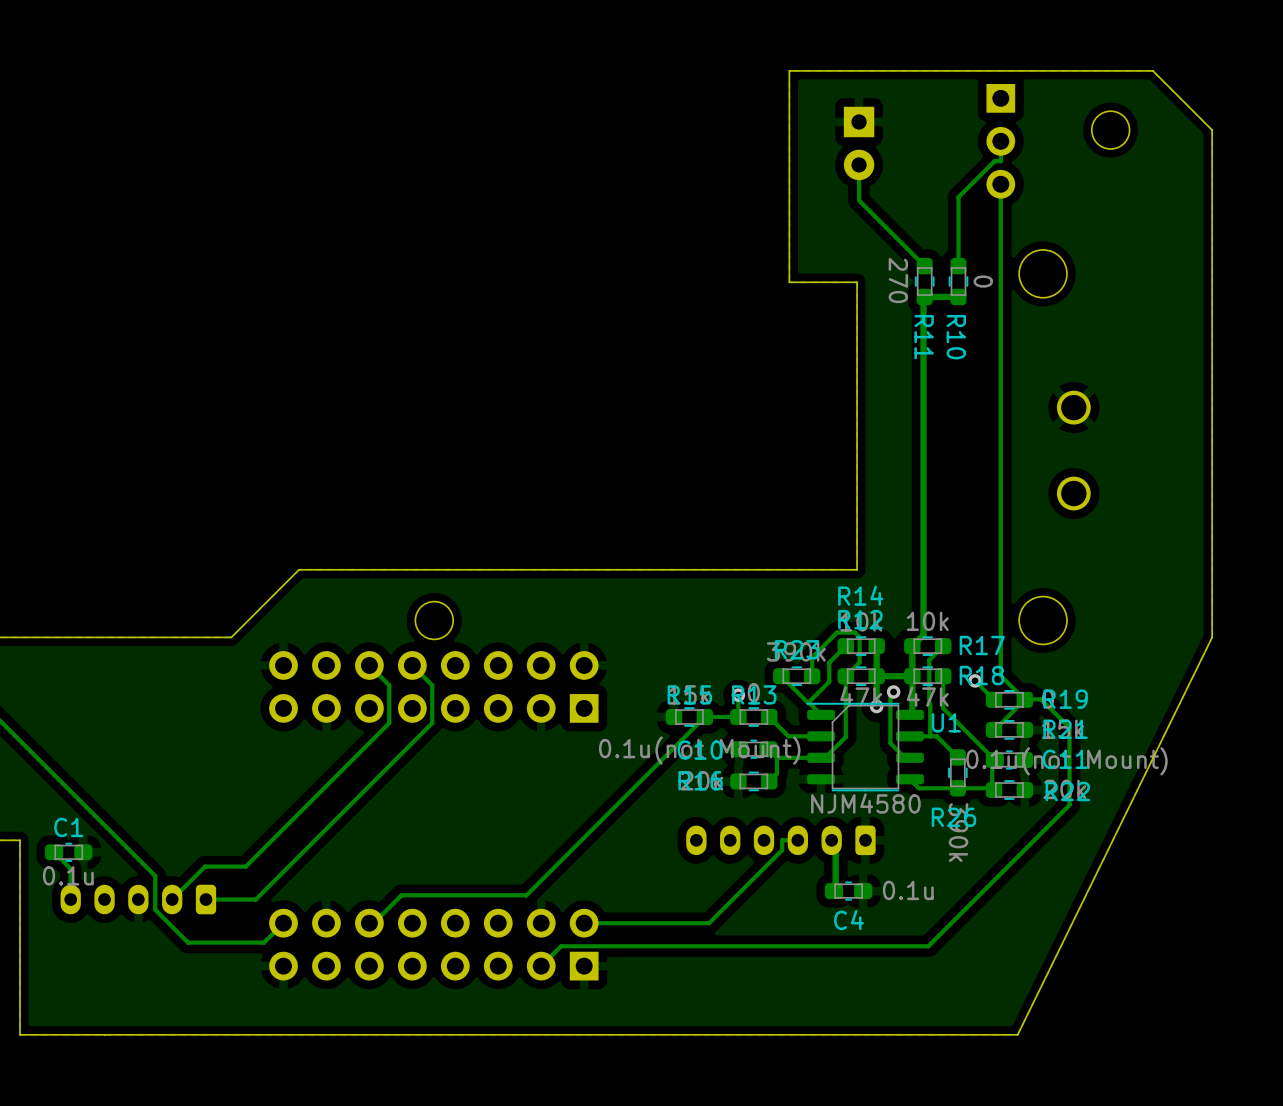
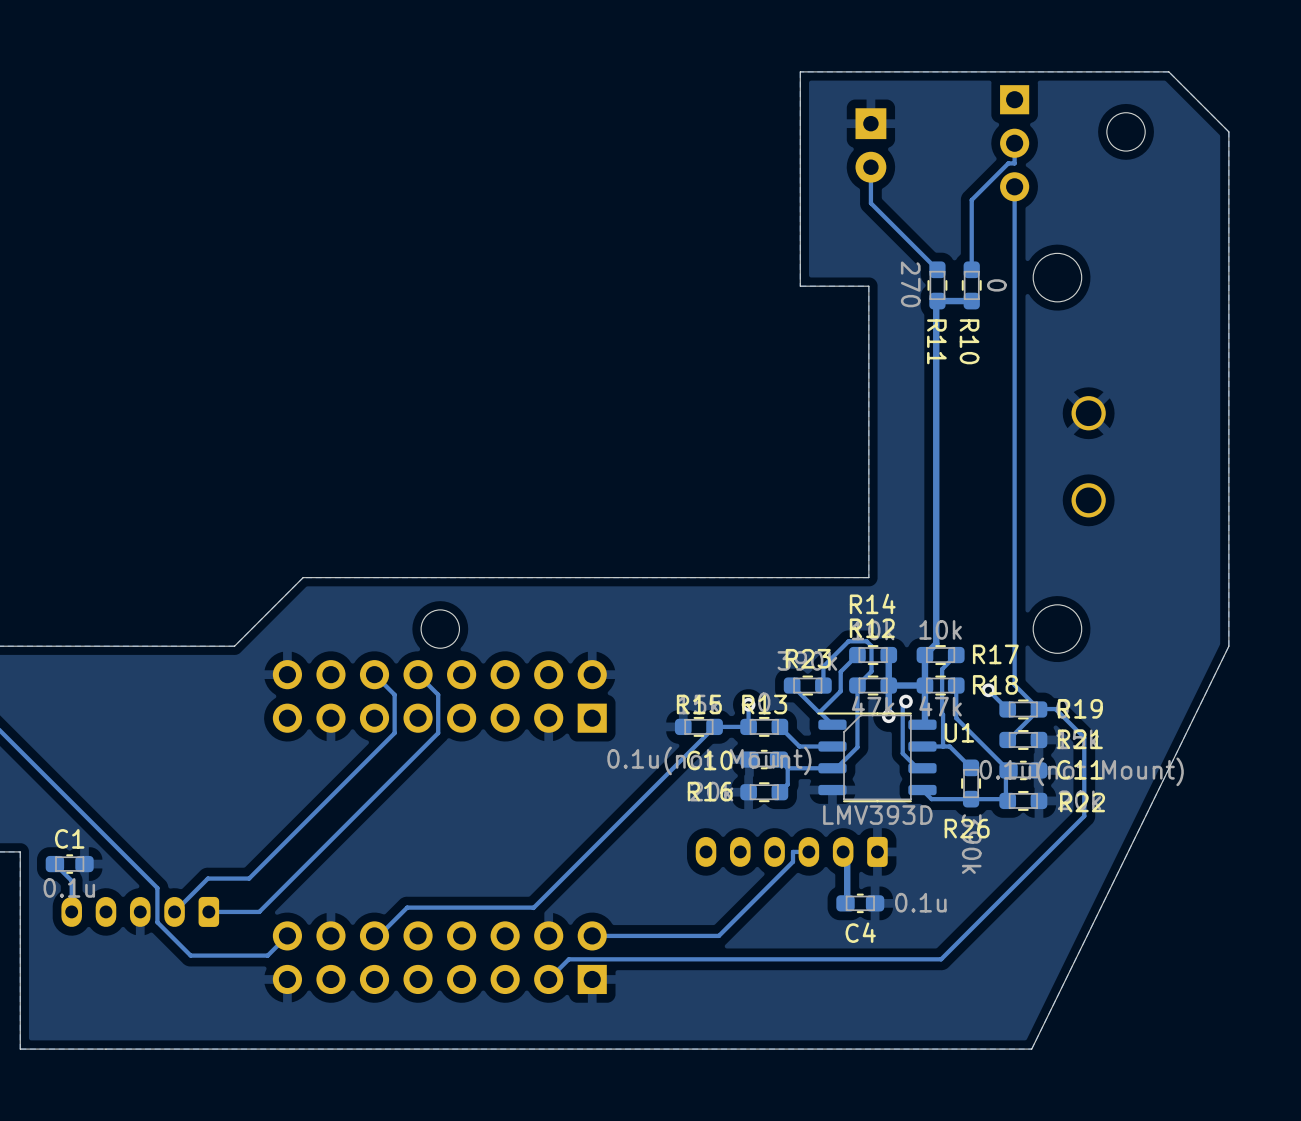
U1 value: NJM4580 (865, 803) -> LMV393D (877, 815)

